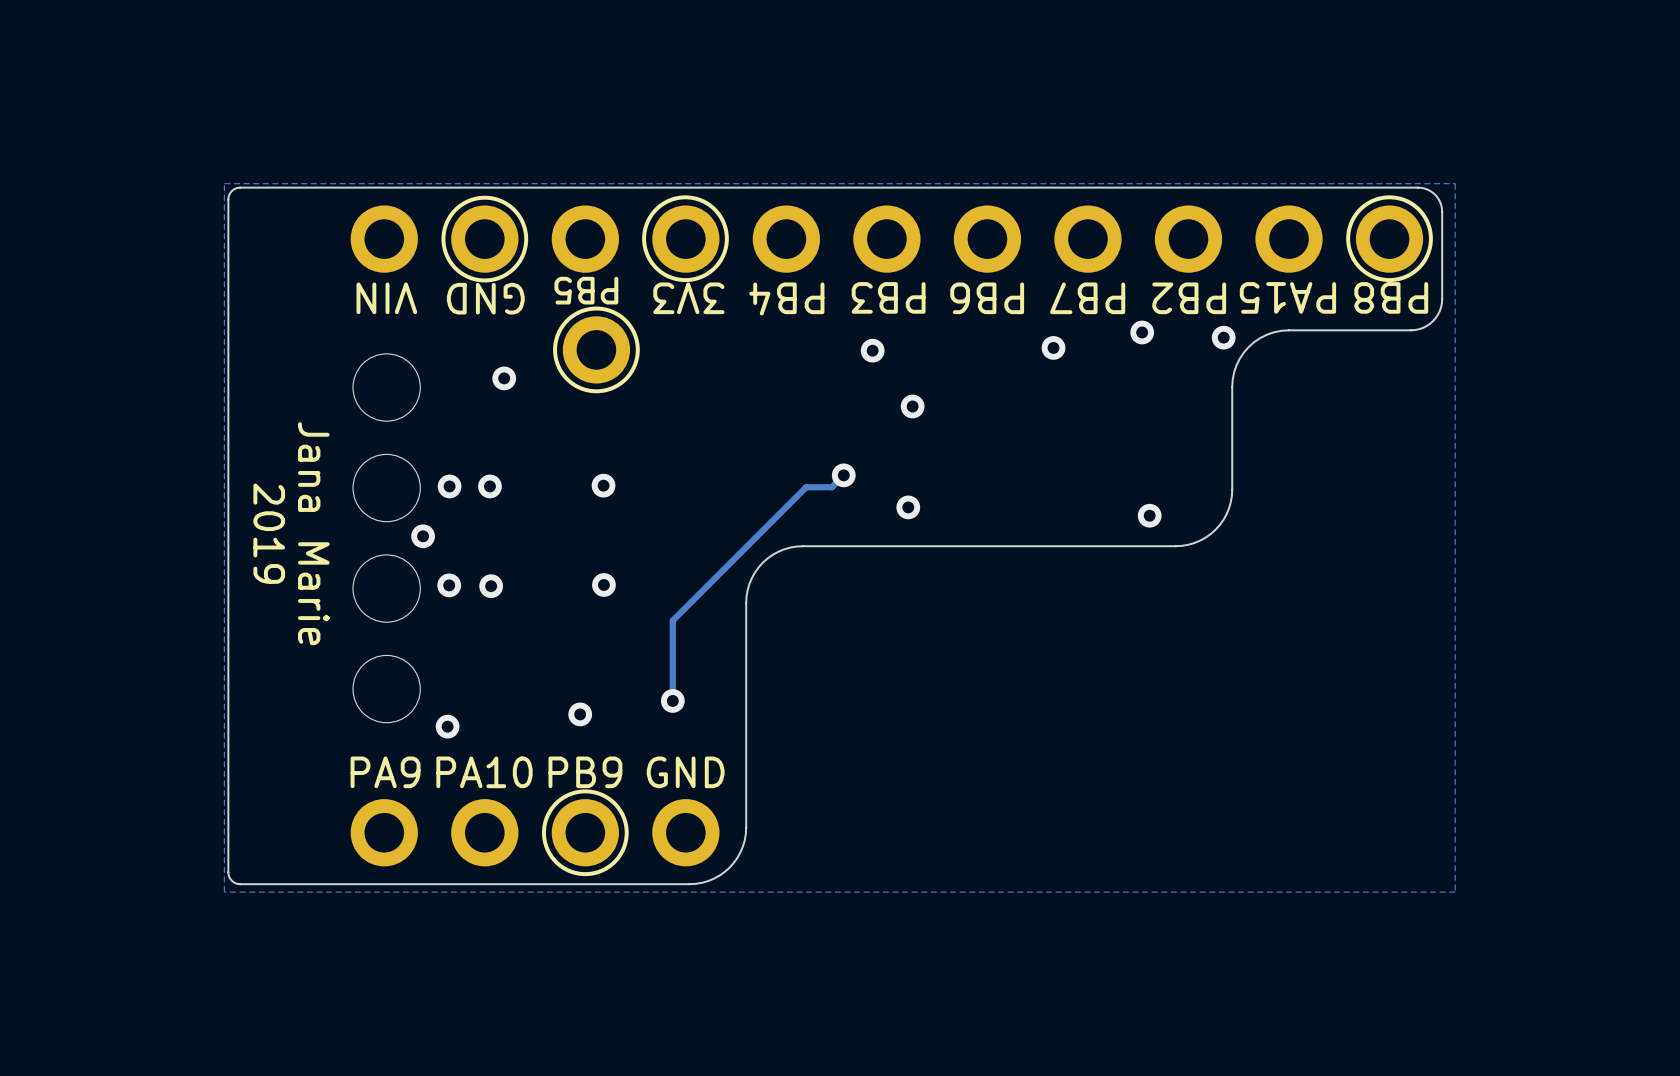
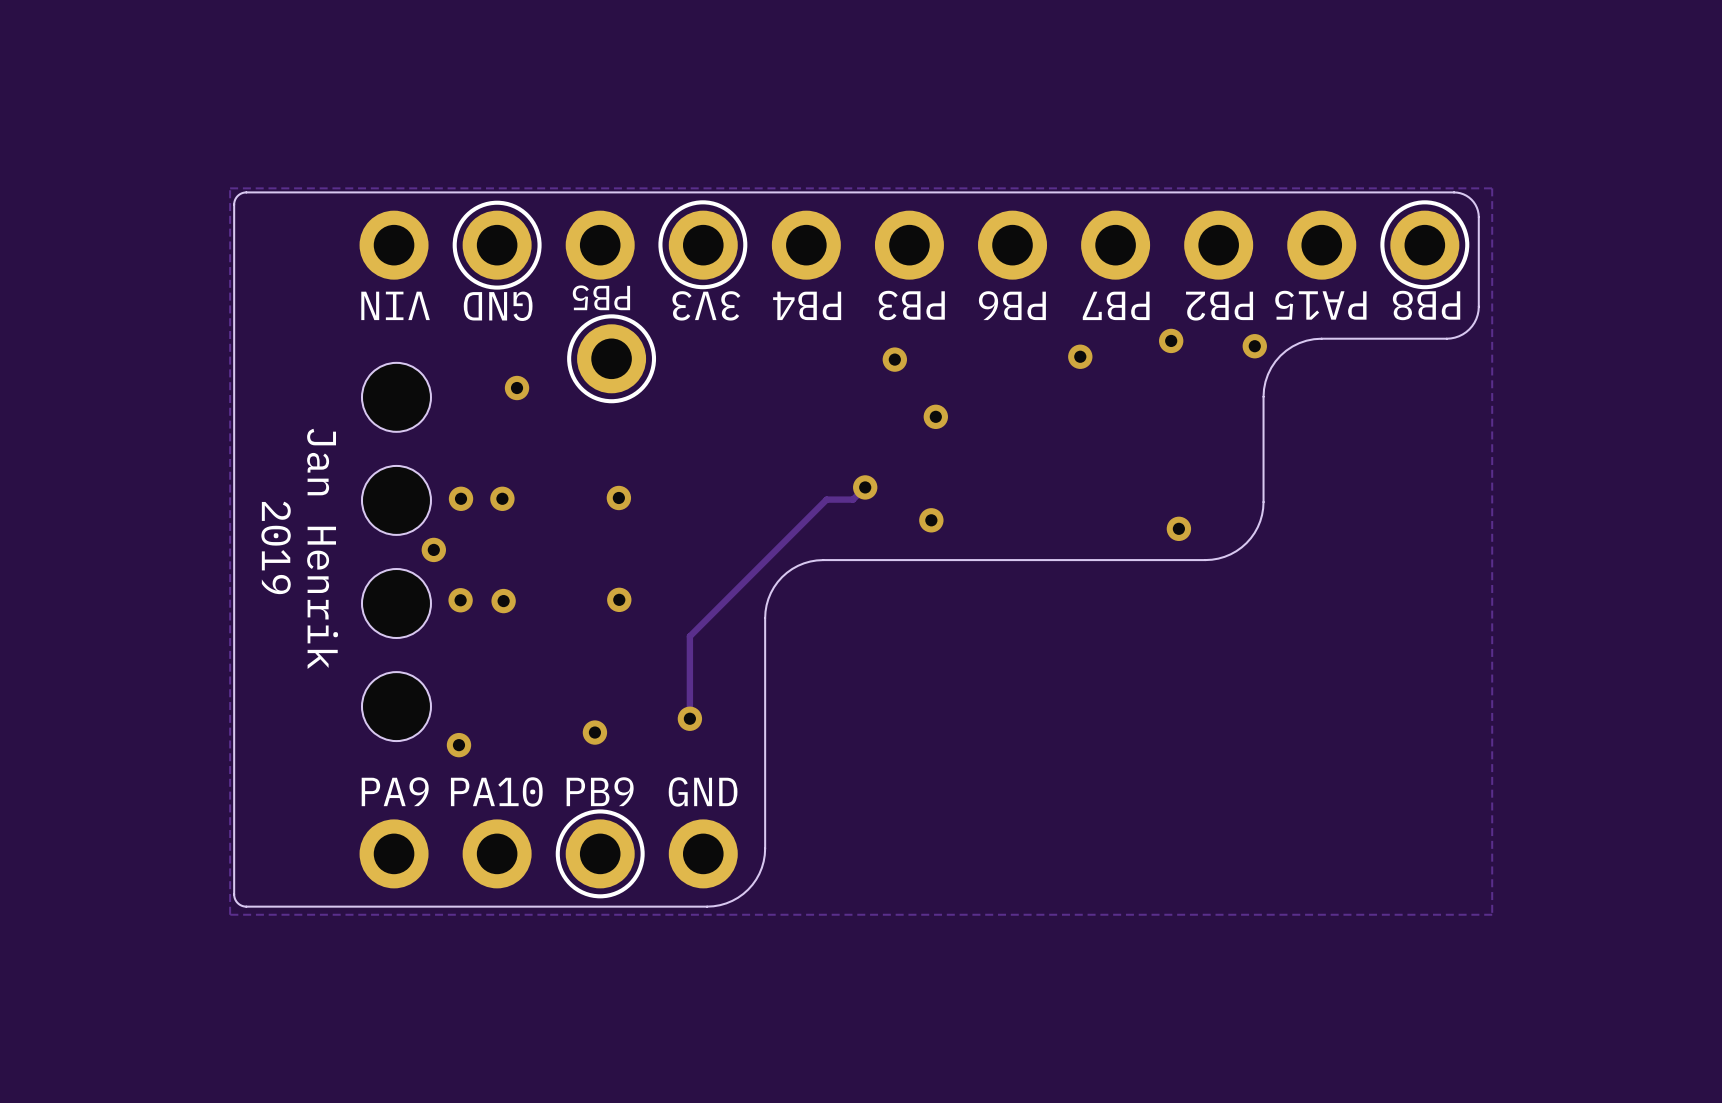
text: Jana Marie (313, 533) -> Jan Henrik (322, 548)

